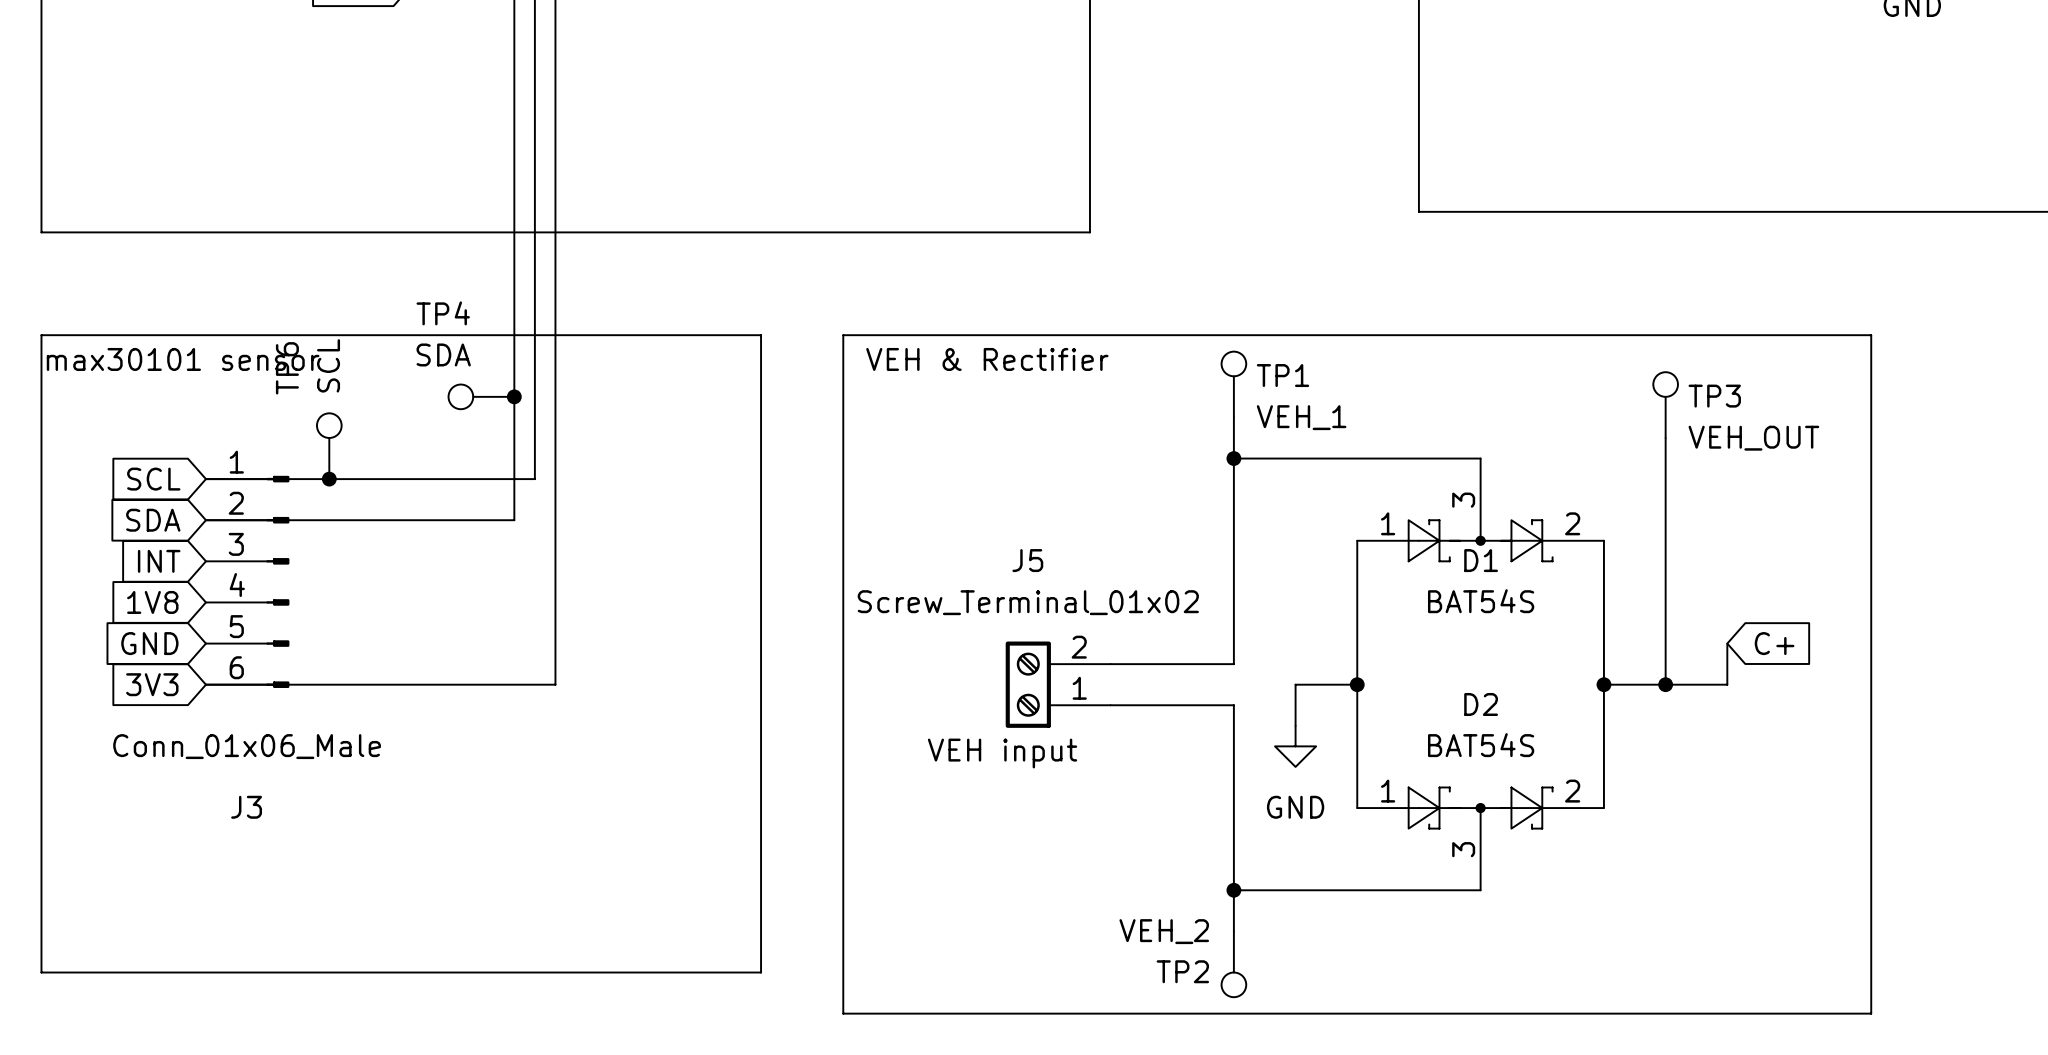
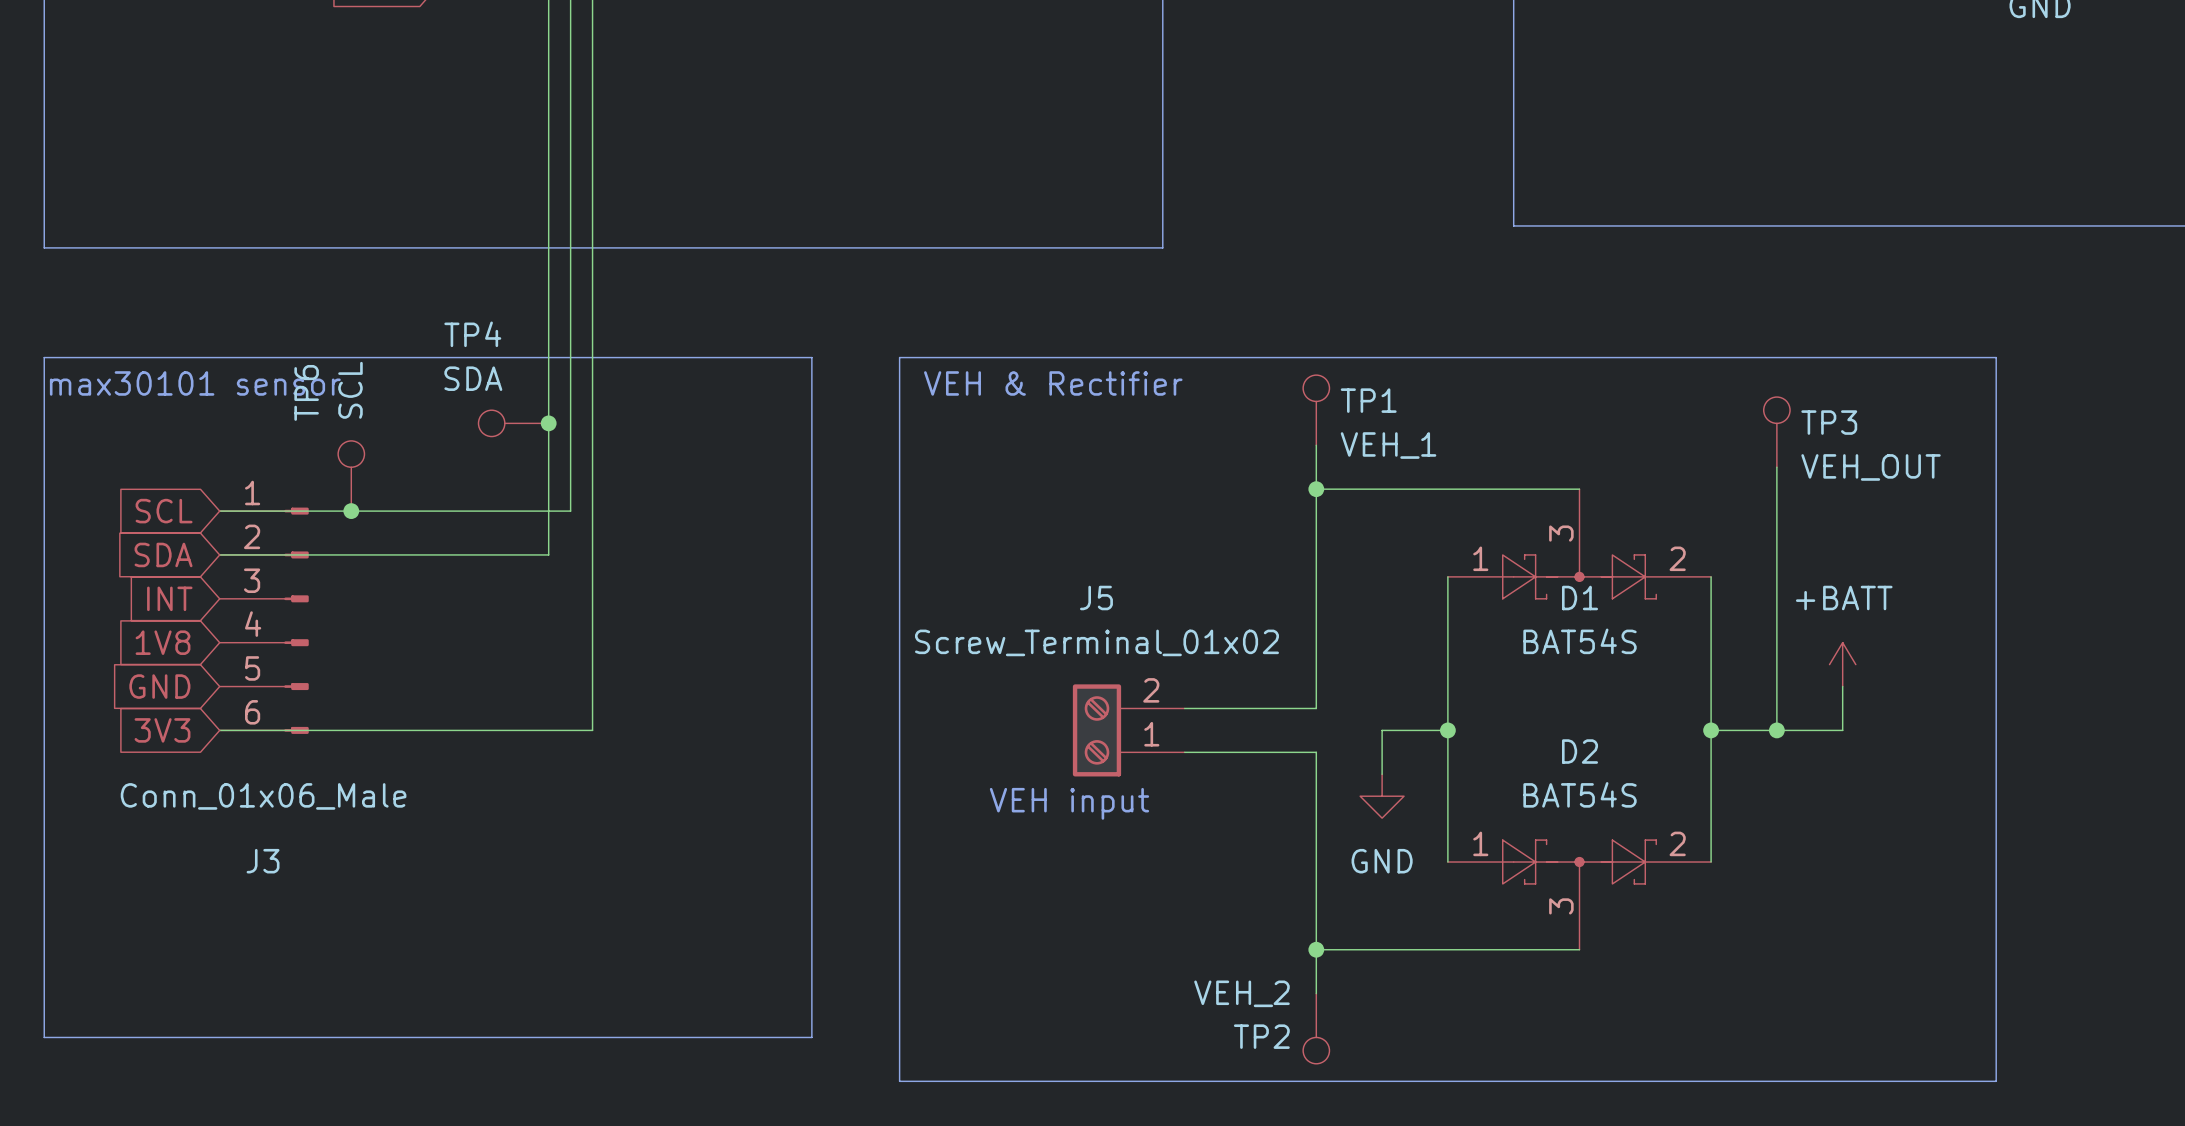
power symbol: none -> +BATT (1842, 664)
global label: C+ (1774, 643) -> none

